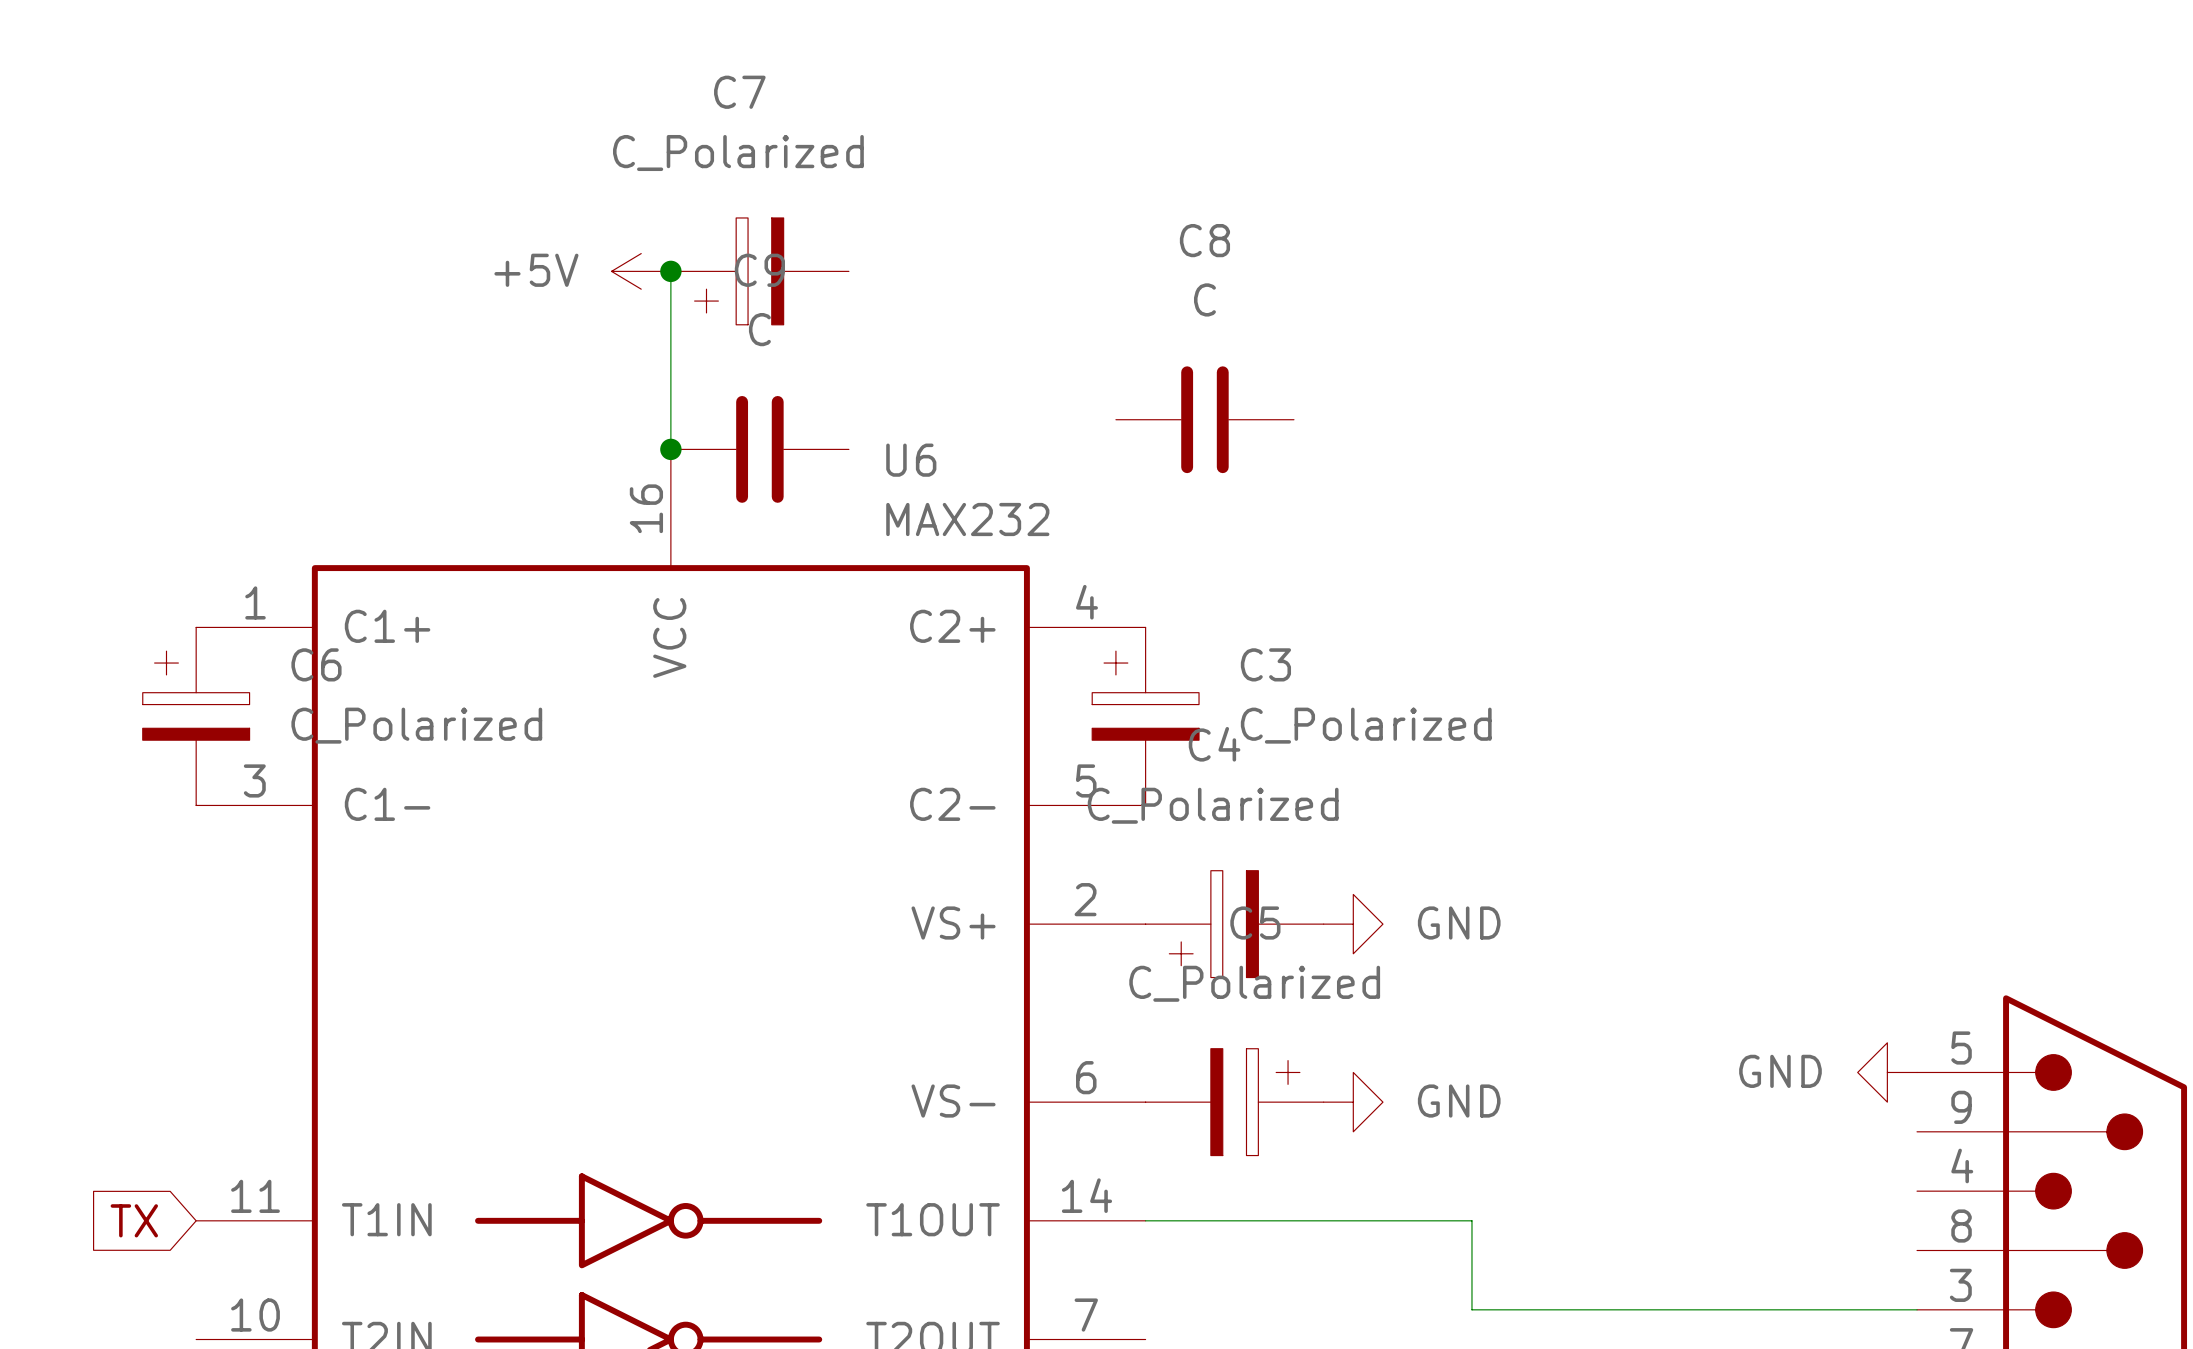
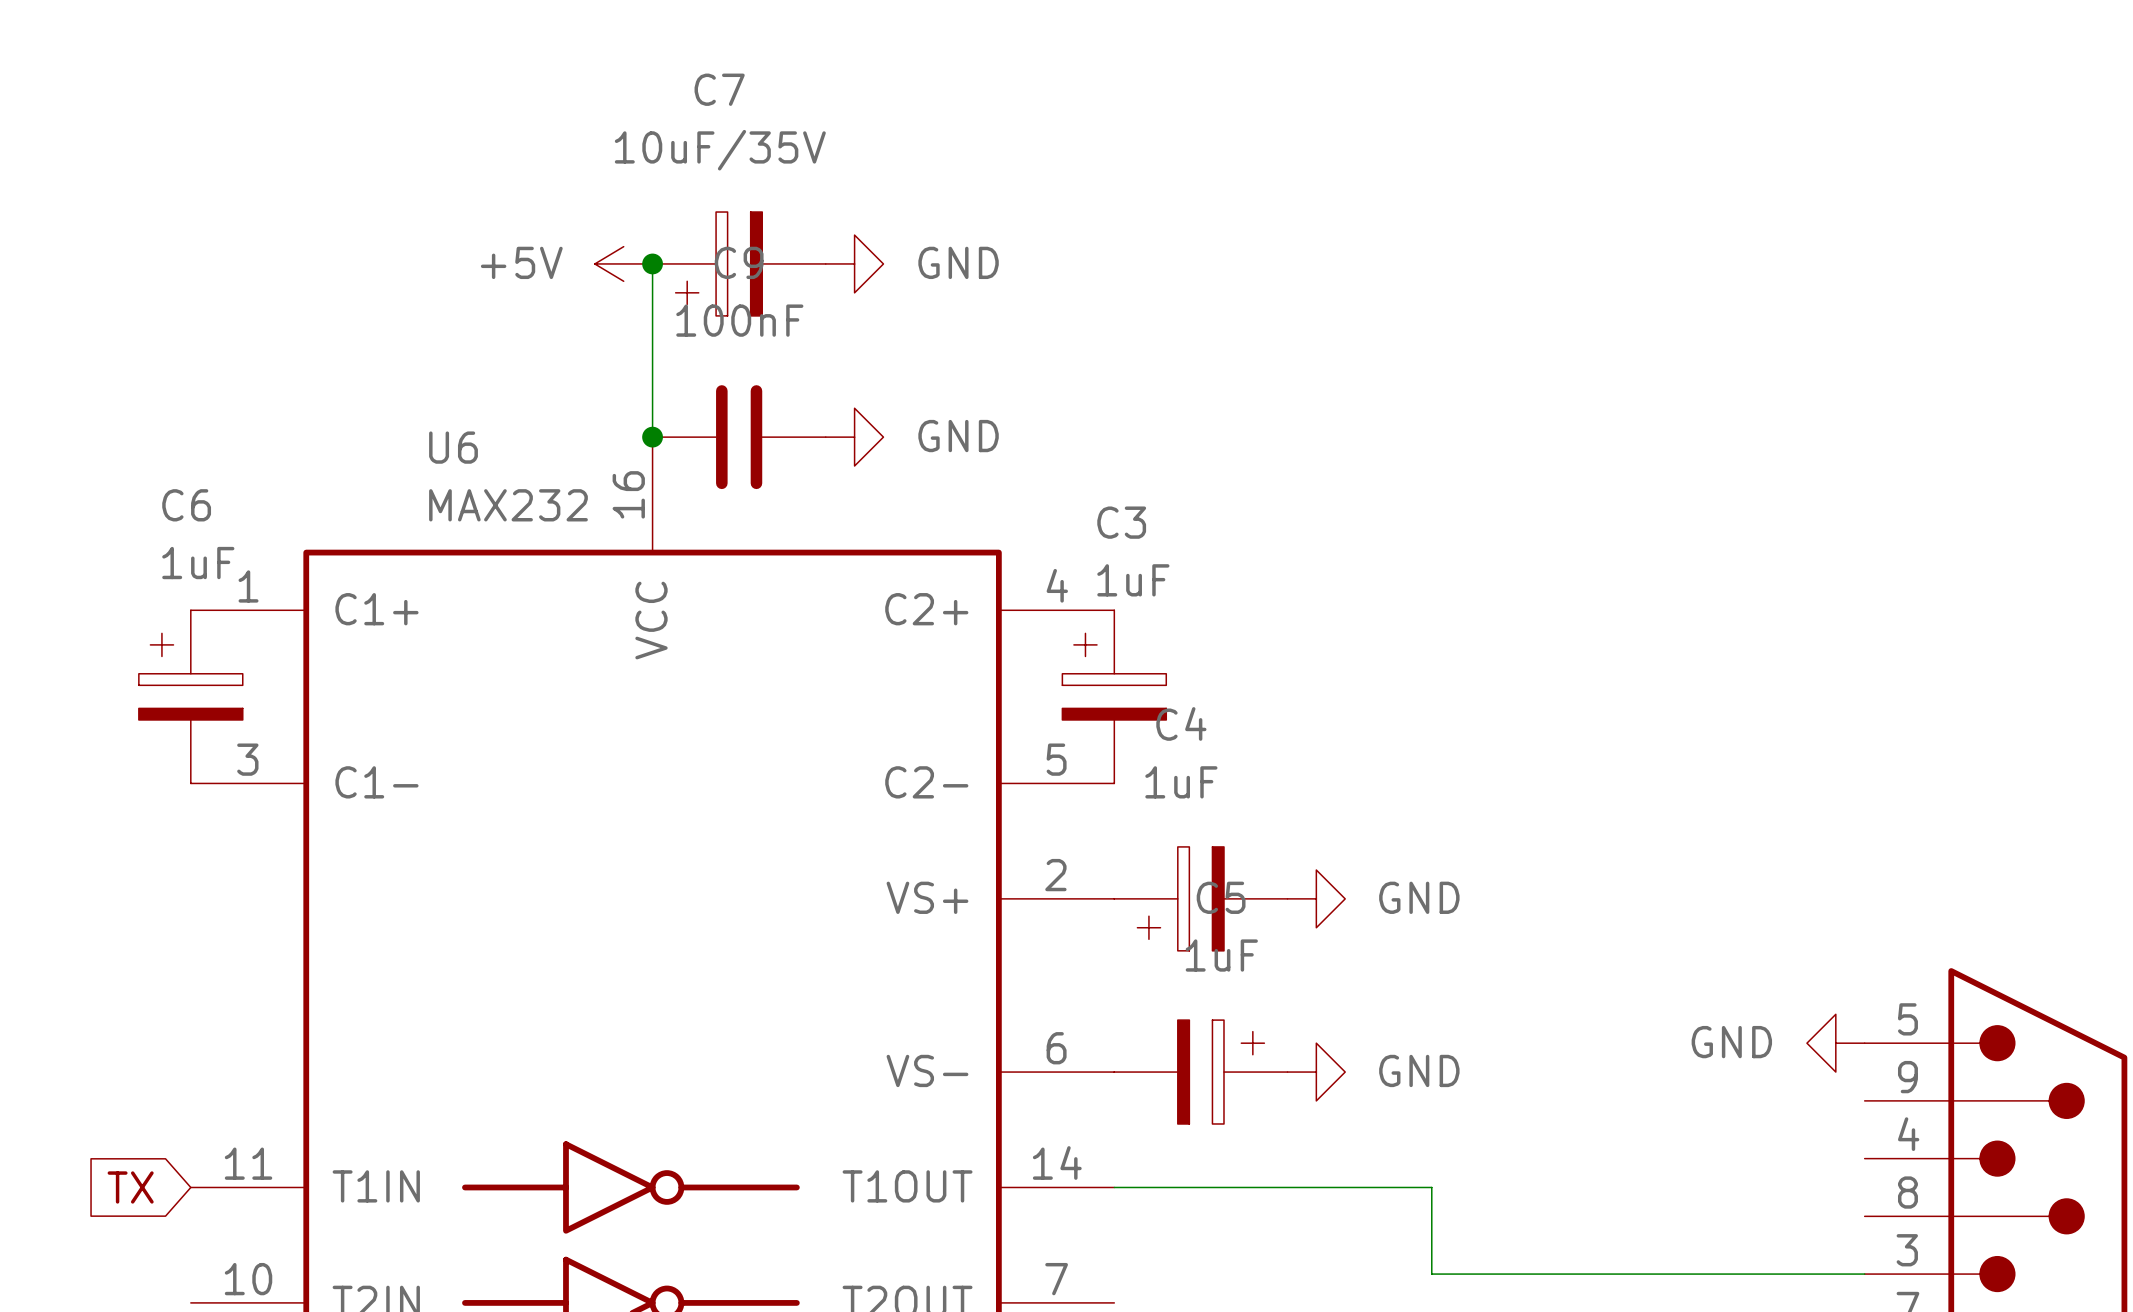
C7 value: C_Polarized (738, 153) -> 10uF/35V (720, 150)
power symbol: none -> GND (854, 263)
C9 value: C (759, 329) -> 100nF (739, 320)
C8: C (1204, 419) -> none
power symbol: none -> GND (854, 437)
U6 name position: U6 (911, 460) -> U6 (453, 447)
U6 value position: MAX232 (967, 519) -> MAX232 (508, 505)
C6 name position: C6 (316, 664) -> C6 (186, 505)
C3 name position: C3 (1265, 664) -> C3 (1121, 522)
C6 value: C_Polarized (416, 725) -> 1uF (198, 563)
C3 value: C_Polarized (1366, 725) -> 1uF (1133, 580)
C4 value: C_Polarized (1213, 805) -> 1uF (1181, 782)
C5 value: C_Polarized (1254, 983) -> 1uF (1221, 955)

